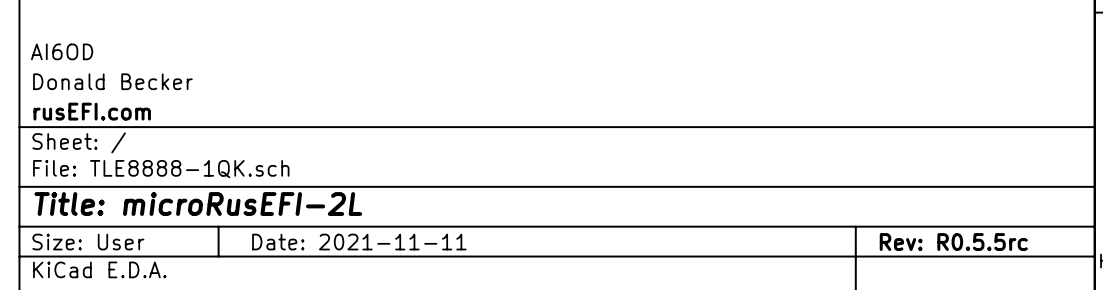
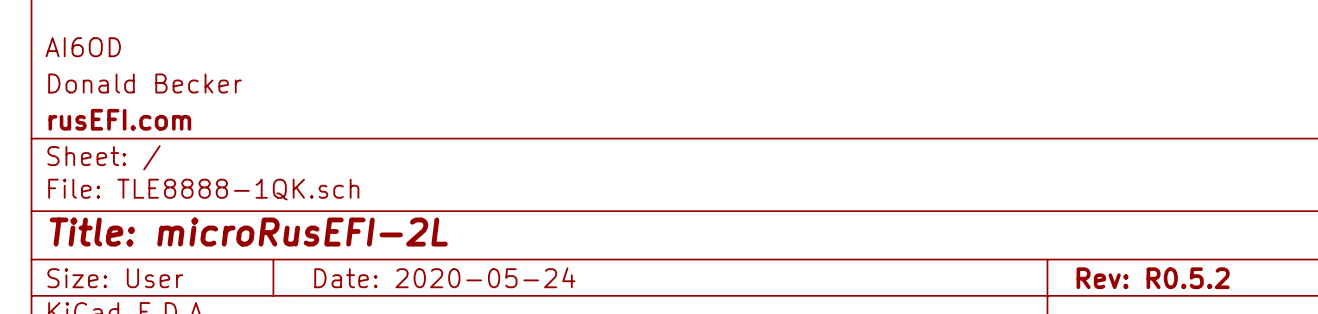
title block: Date: 2021-11-11 (359, 242) -> Date: 2020-05-24 (444, 277)
title block: Rev: R0.5.5rc (953, 242) -> Rev: R0.5.2 (1153, 278)

